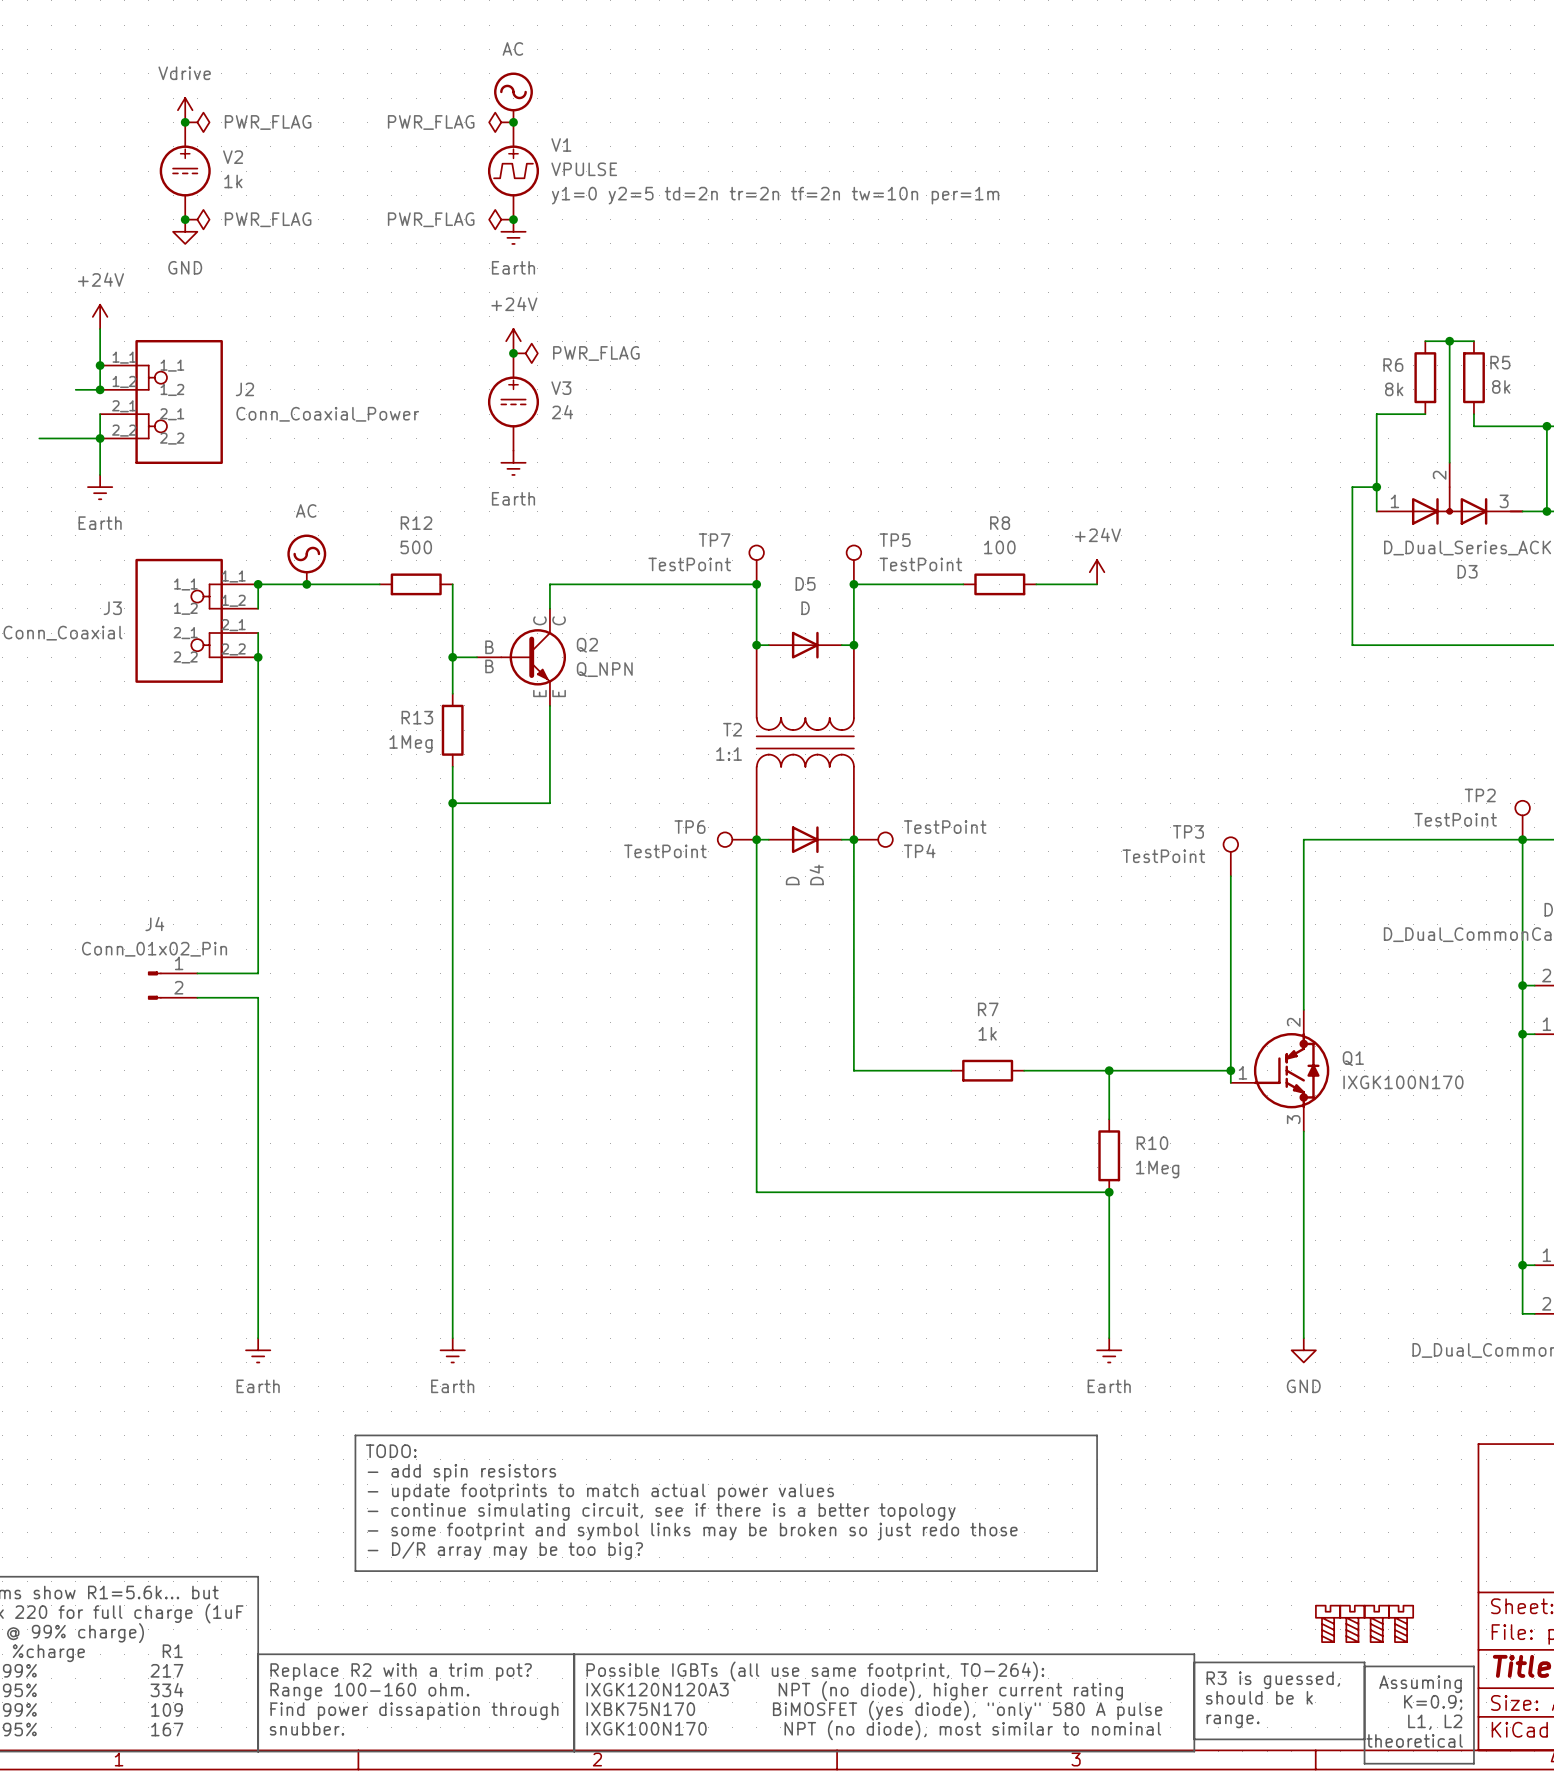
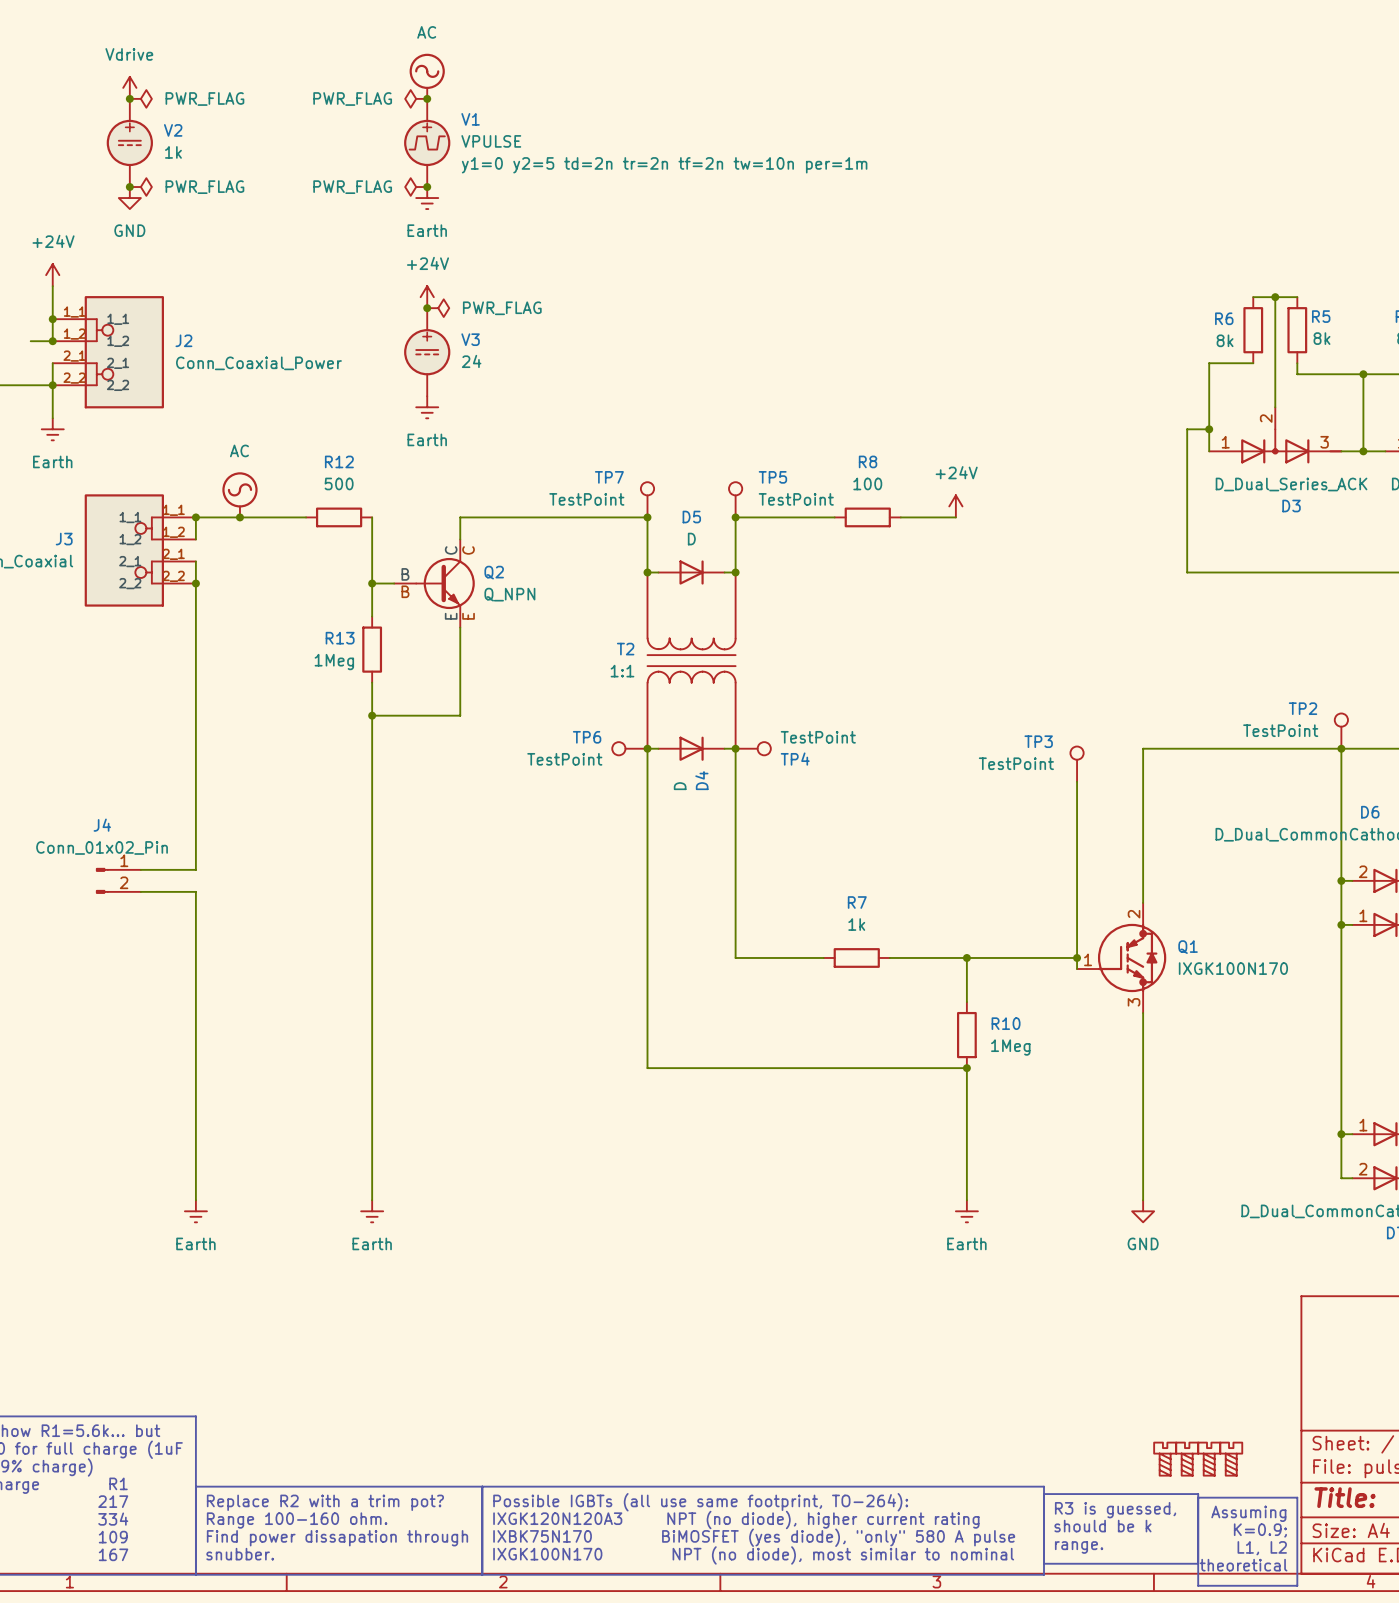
line: (355, 1435) (1097, 1435) (1097, 1571) (355, 1571) (355, 1435) -> none
text: TODO: (391, 1451) -> none
text: - add spin resistors (461, 1472) -> none
text: - update footprints to match actual power values (600, 1492) -> none
text: - continue simulating circuit, see if there is a better topology (661, 1511) -> none
text: - some footprint and symbol links may be broken so just redo those (692, 1531) -> none
text: - D/R array may be too big? (505, 1550) -> none

